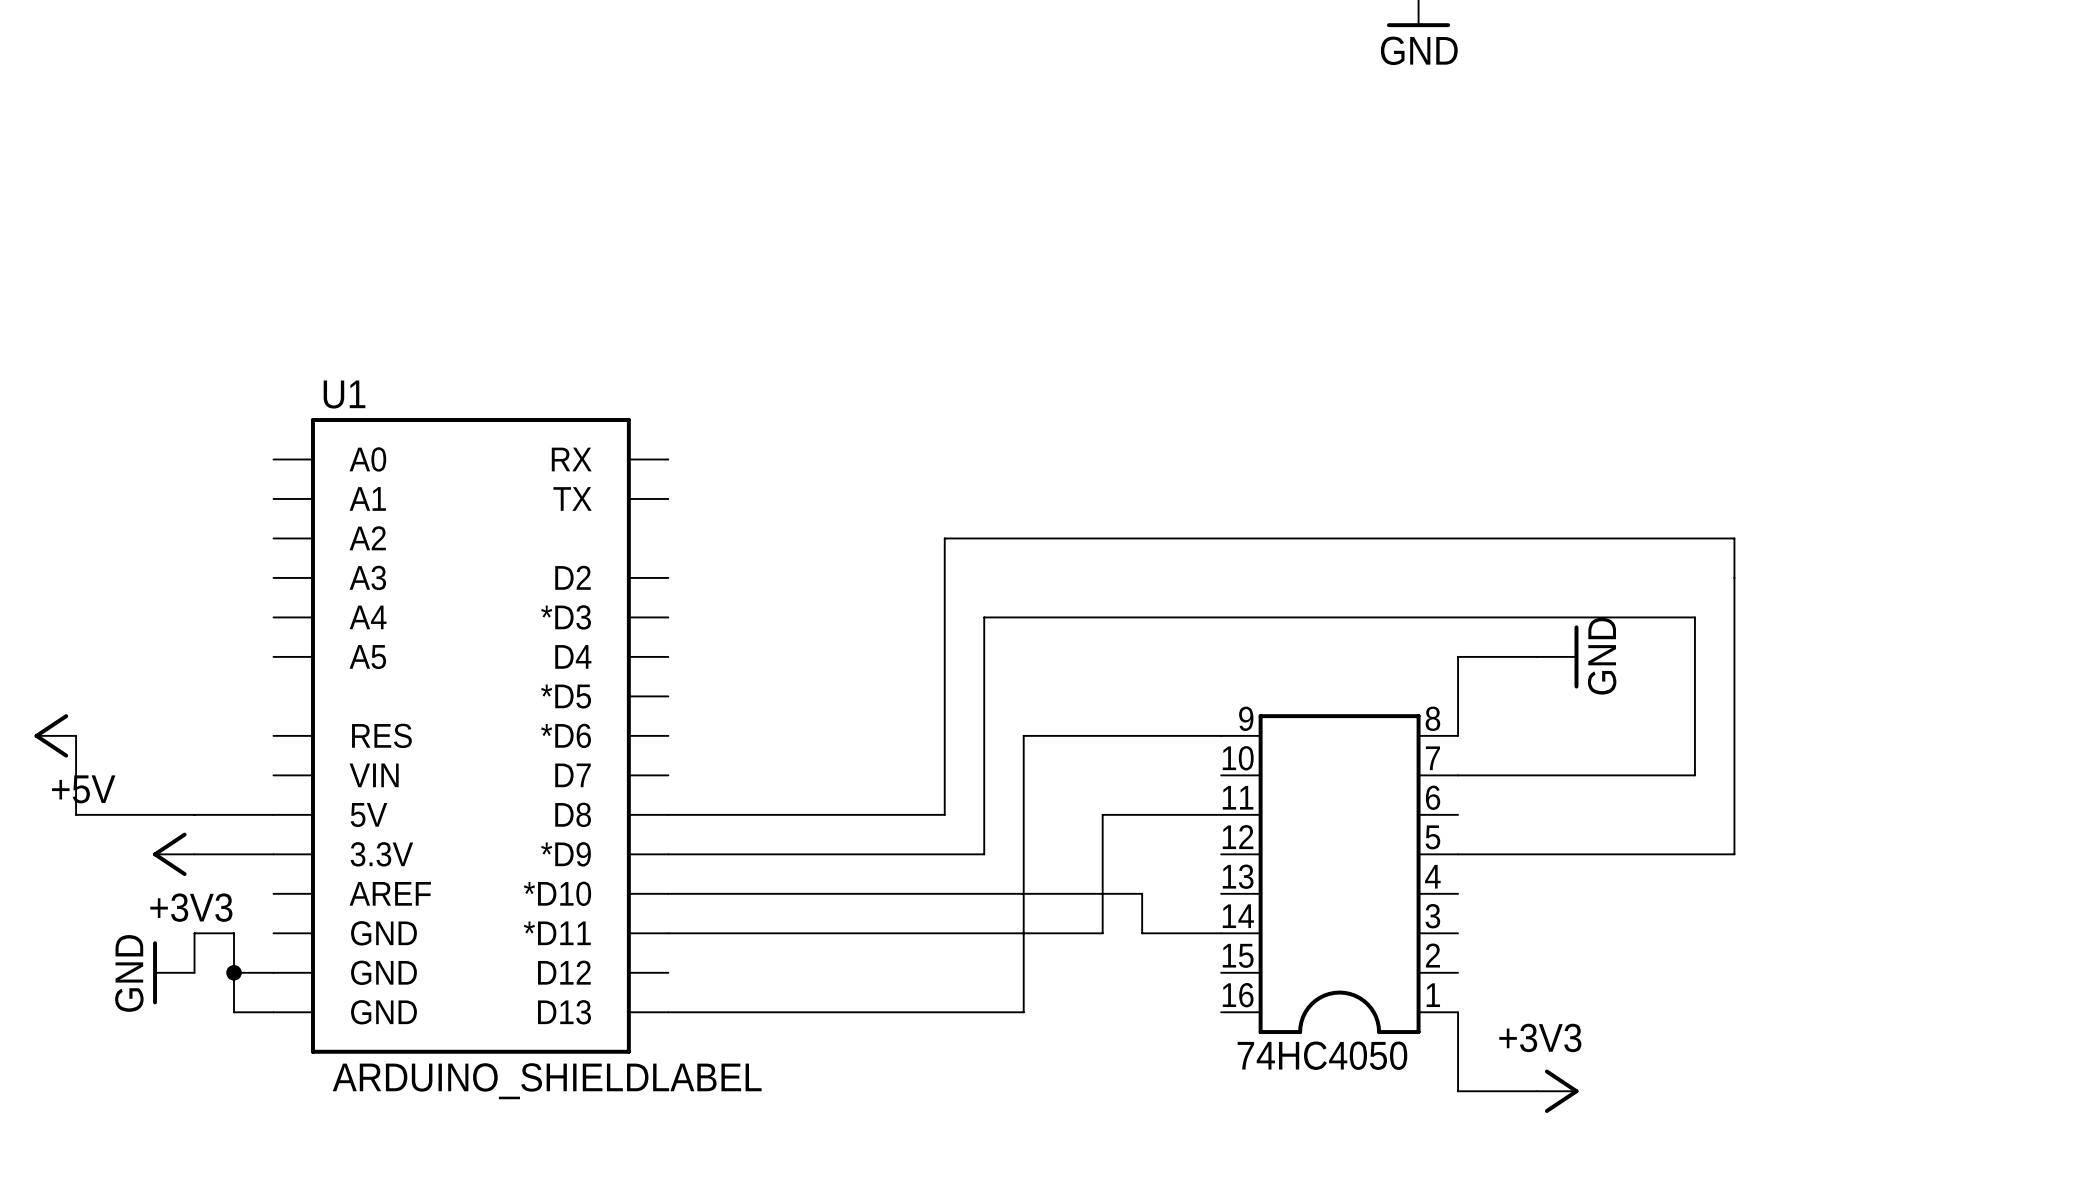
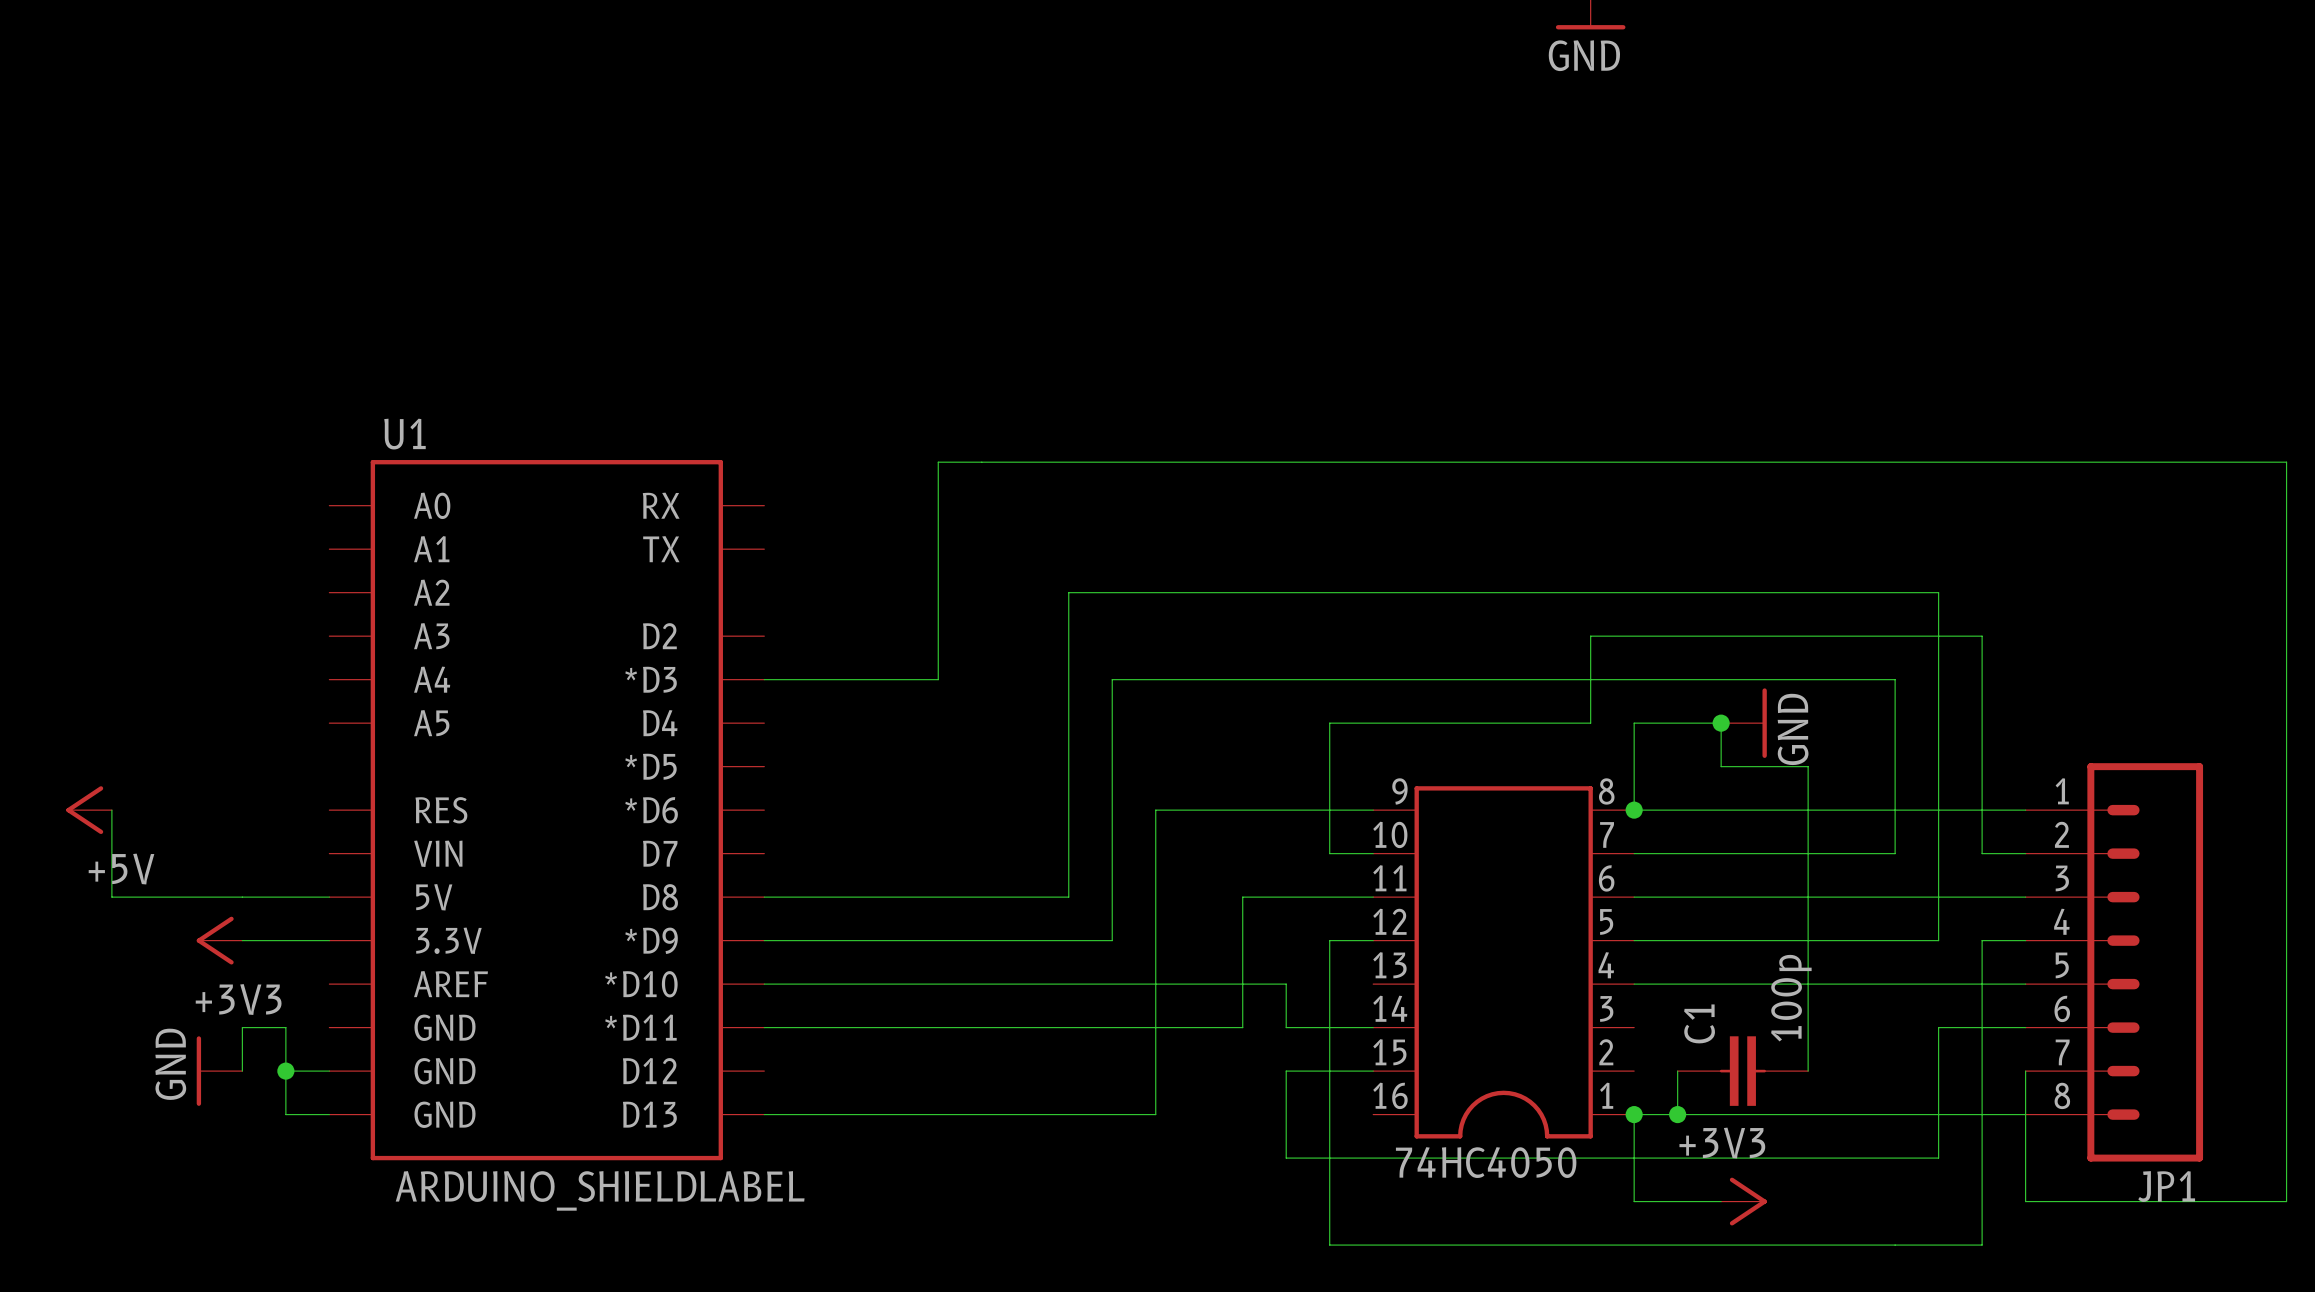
wire: none -> (764, 679) (938, 679) (938, 462) (2286, 462) (2286, 1201) (2025, 1201) (2025, 1071)
wire: none -> (1721, 723) (1721, 766) (1808, 766) (1808, 1071)
junction: none -> (1721, 723)
wire: none -> (1634, 810) (2025, 810)
junction: none -> (1634, 810)
wire: none -> (1373, 853) (1329, 853) (1329, 723) (1590, 723) (1590, 636) (1982, 636) (1982, 853) (2025, 853)
wire: none -> (1634, 897) (2025, 897)
wire: none -> (1373, 940) (1329, 940) (1329, 1245) (1982, 1245) (1982, 940) (2025, 940)
JP1: none -> (2114, 962)
wire: none -> (1634, 984) (2025, 984)
wire: none -> (2025, 1027) (1938, 1027) (1938, 1158) (1286, 1158) (1286, 1071) (1373, 1071)
wire: none -> (1677, 1071) (1677, 1114)
C1: none -> 100p (1742, 1071)
wire: none -> (1634, 1114) (2025, 1114)
junction: none -> (1634, 1114)
junction: none -> (1677, 1114)

